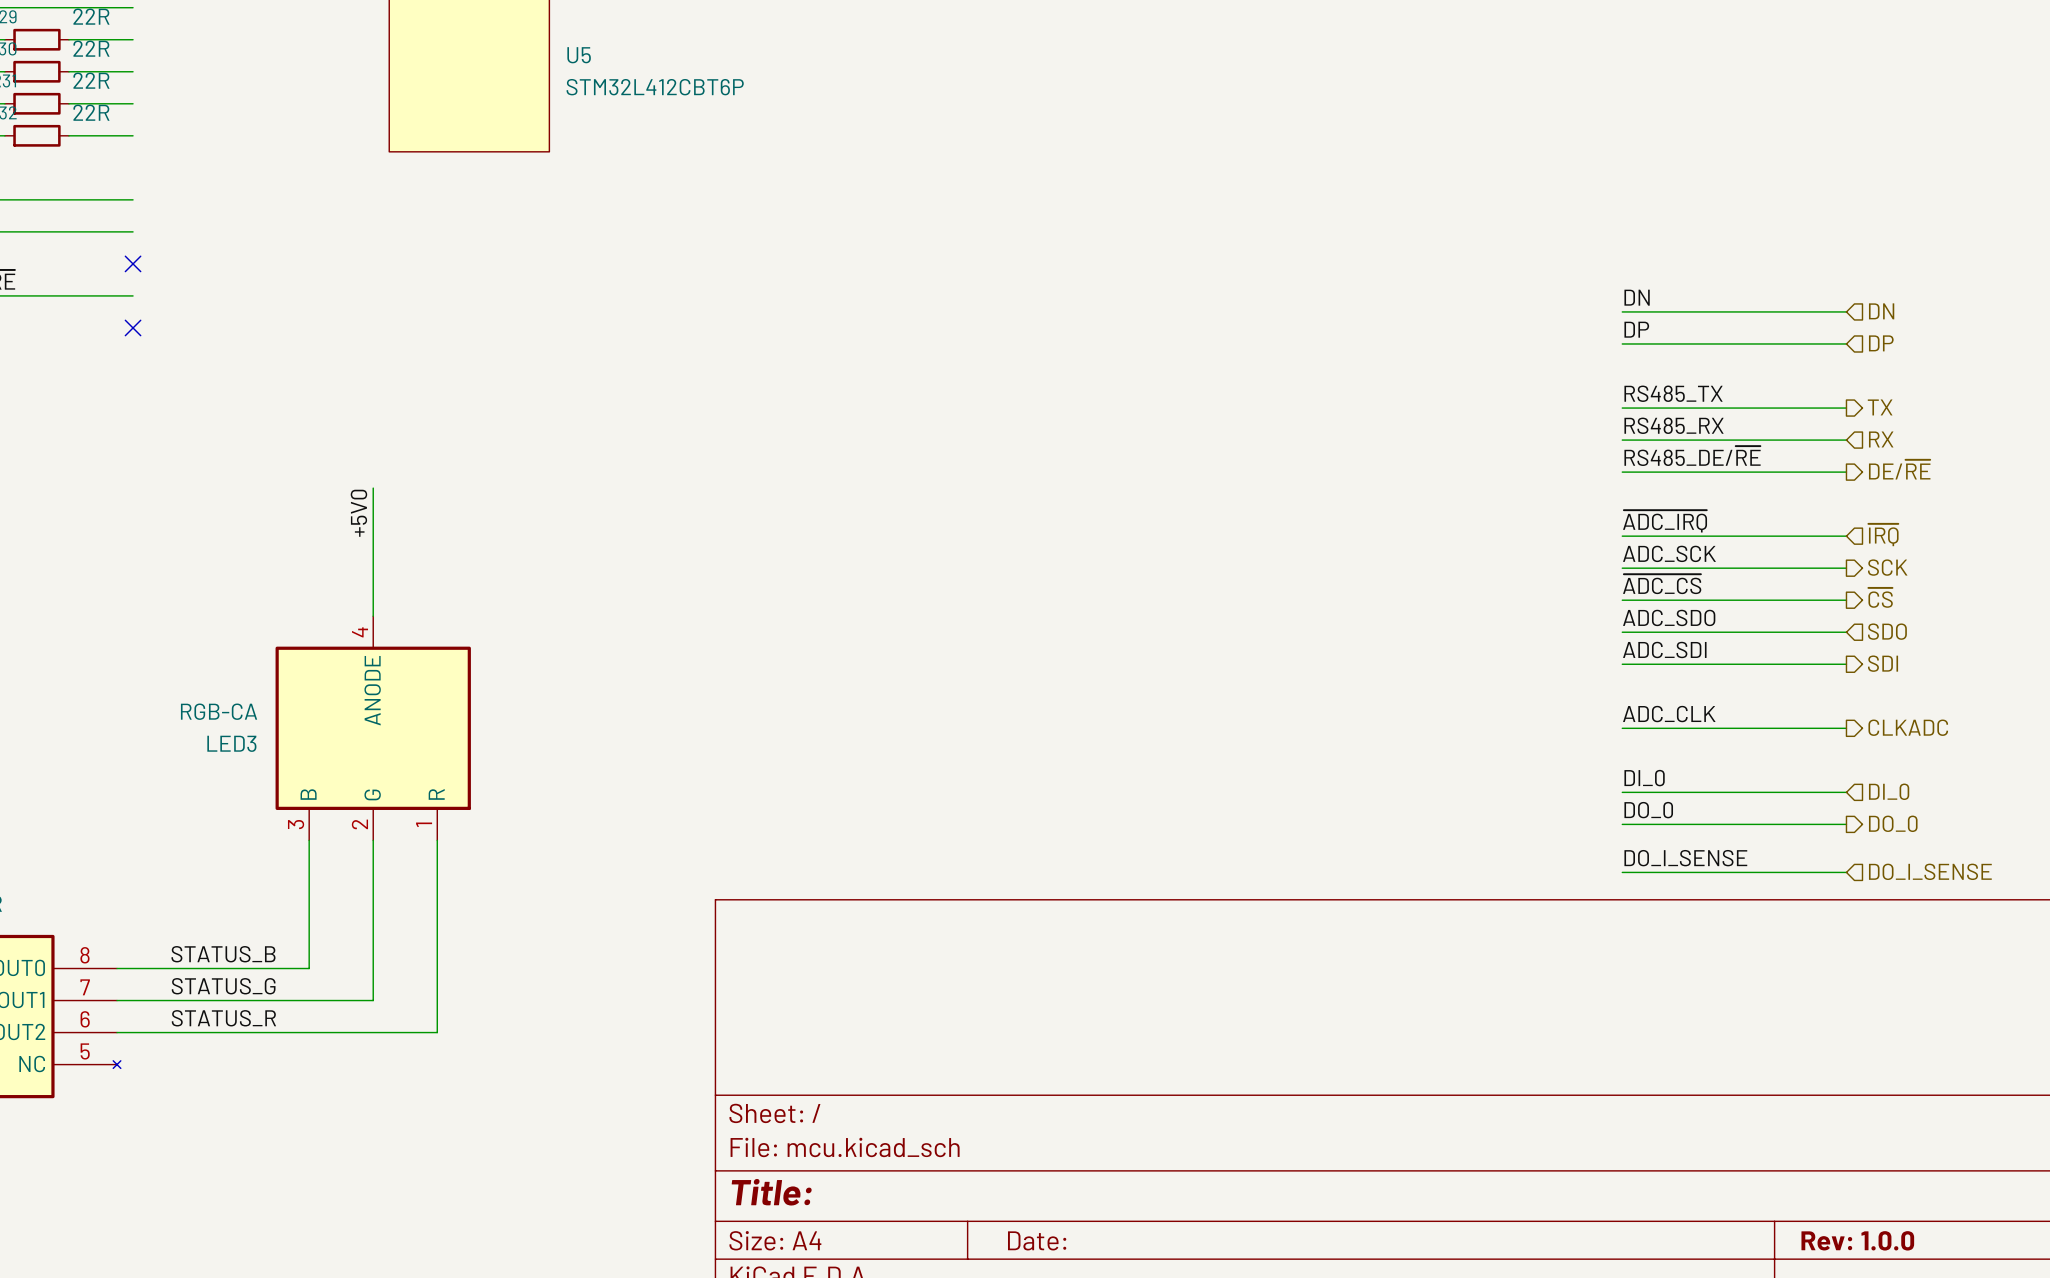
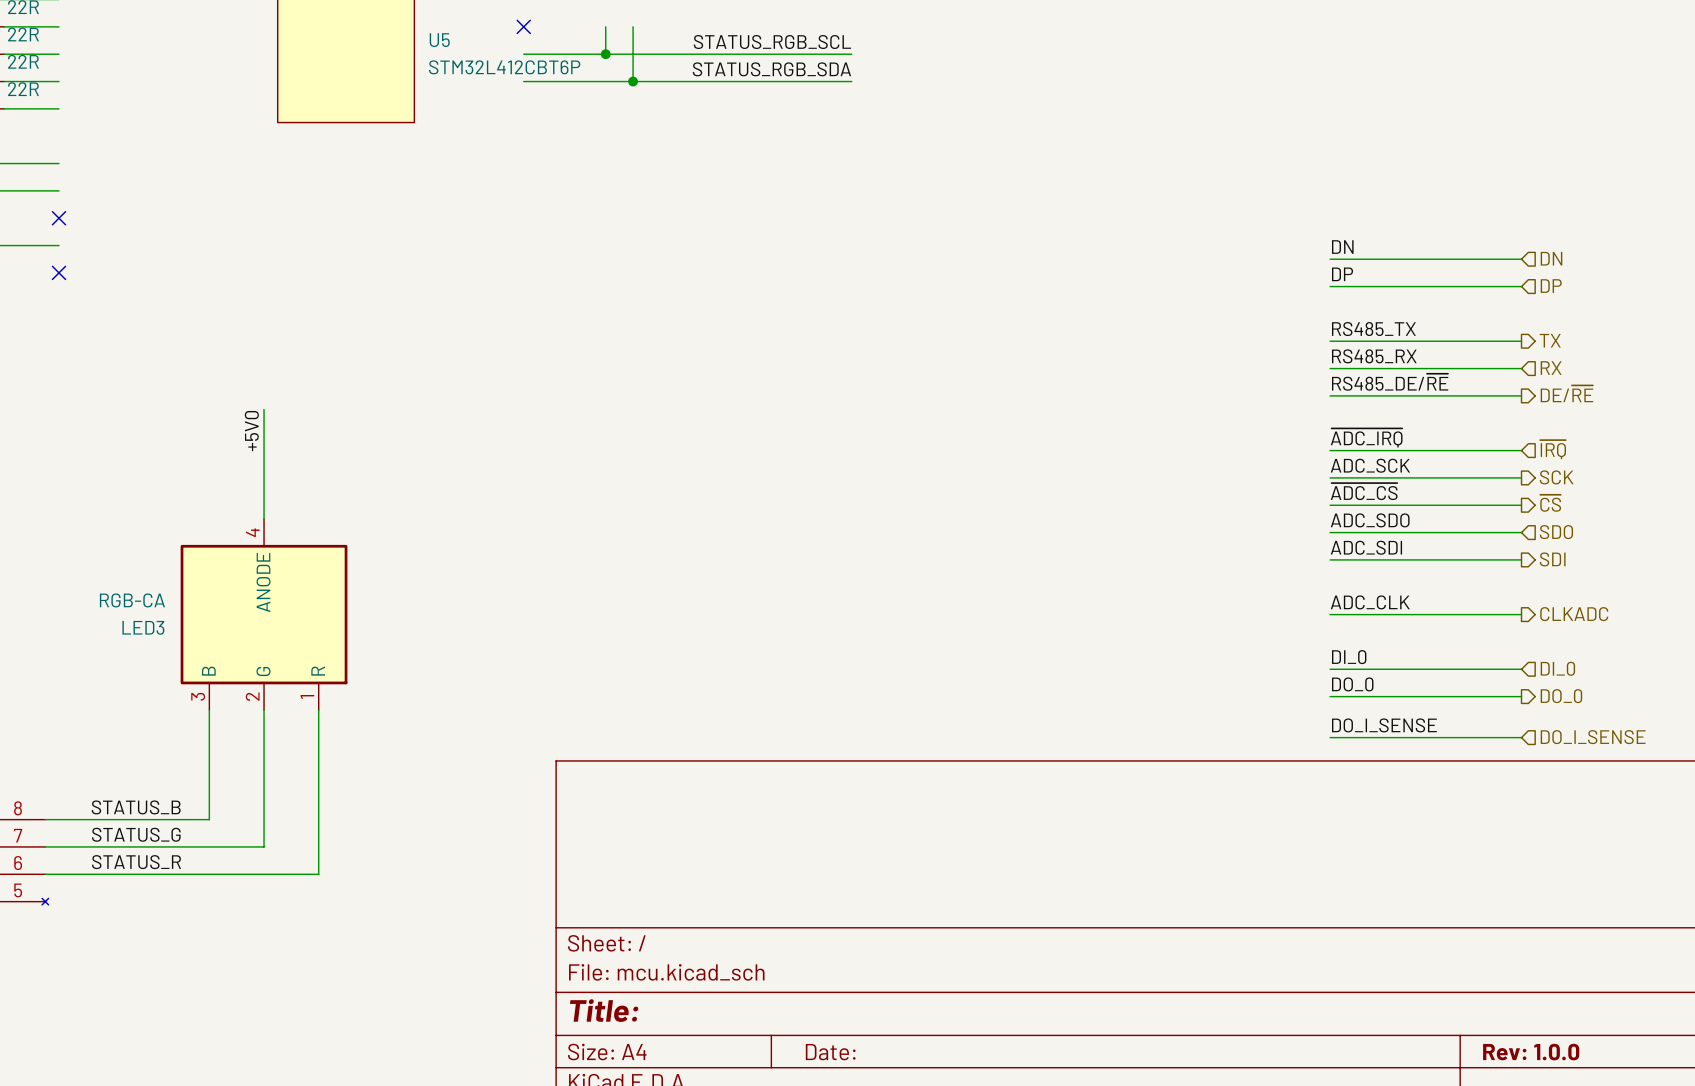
no-connect mark: none -> (523, 26)
wire: none -> (605, 26) (605, 54)
wire: none -> (633, 26) (633, 81)
label: none -> STATUS_RGB_SCL (772, 42)
wire: none -> (523, 54) (851, 54)
junction: none -> (605, 54)
label: none -> STATUS_RGB_SDA (771, 69)
wire: none -> (523, 81) (851, 81)
junction: none -> (633, 81)

